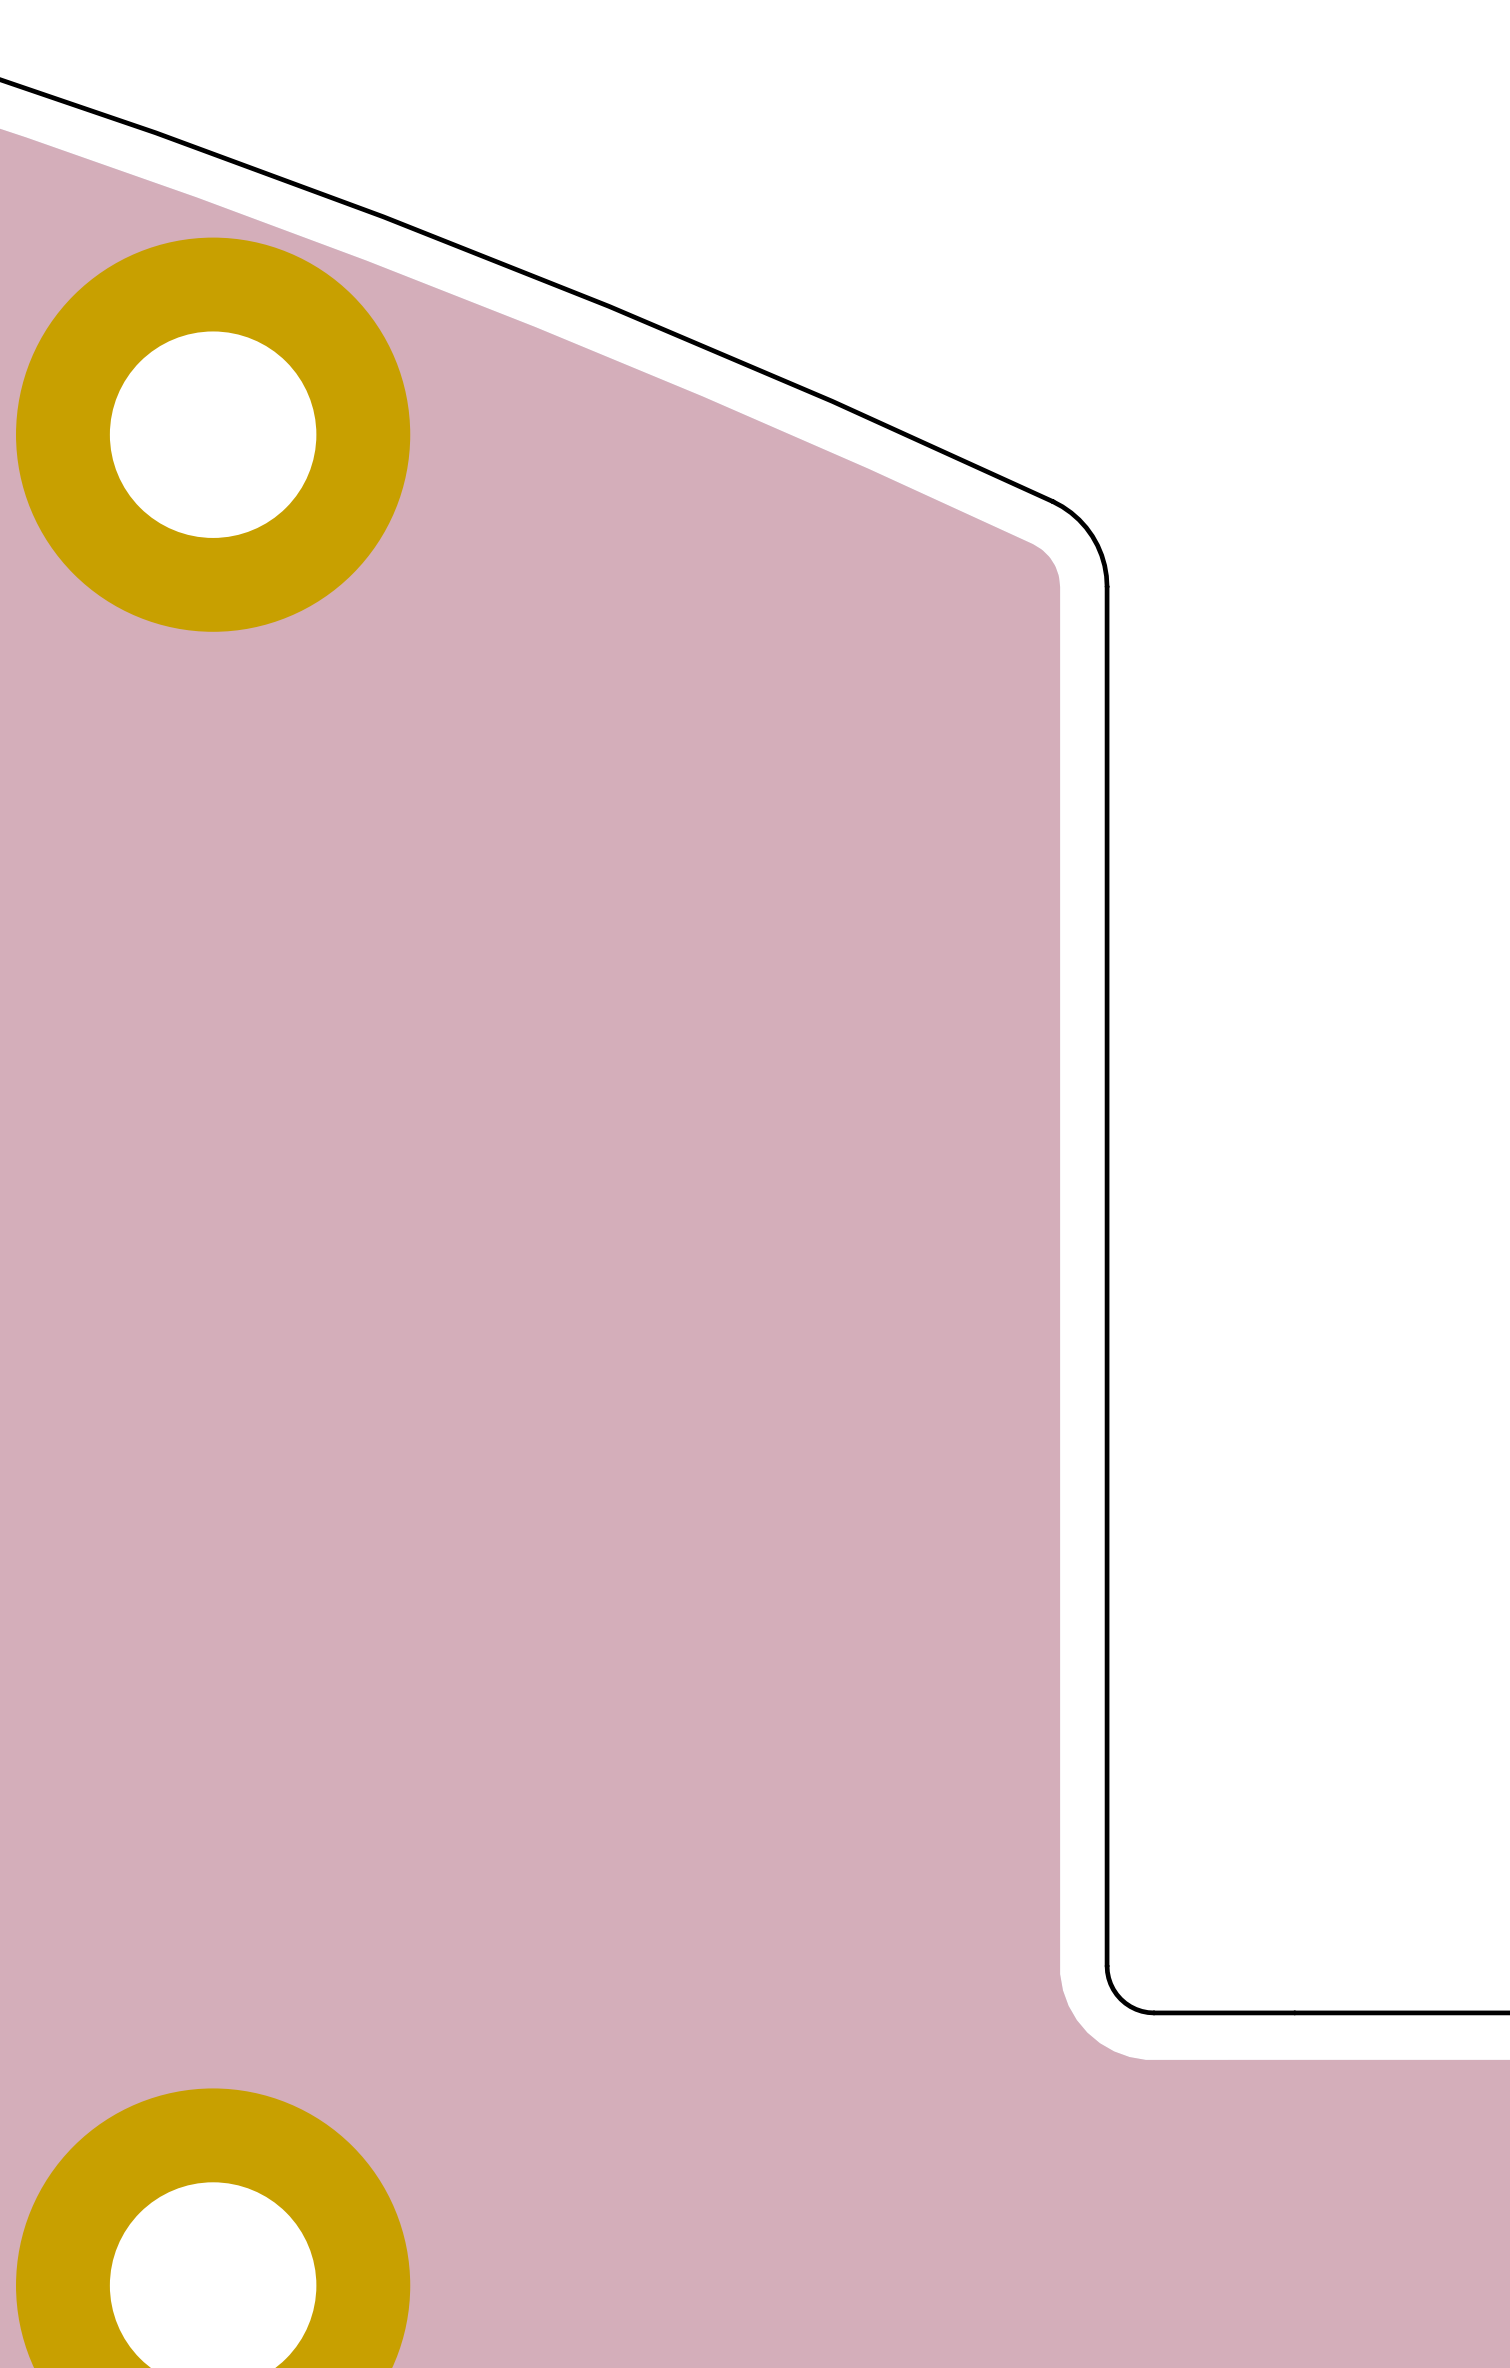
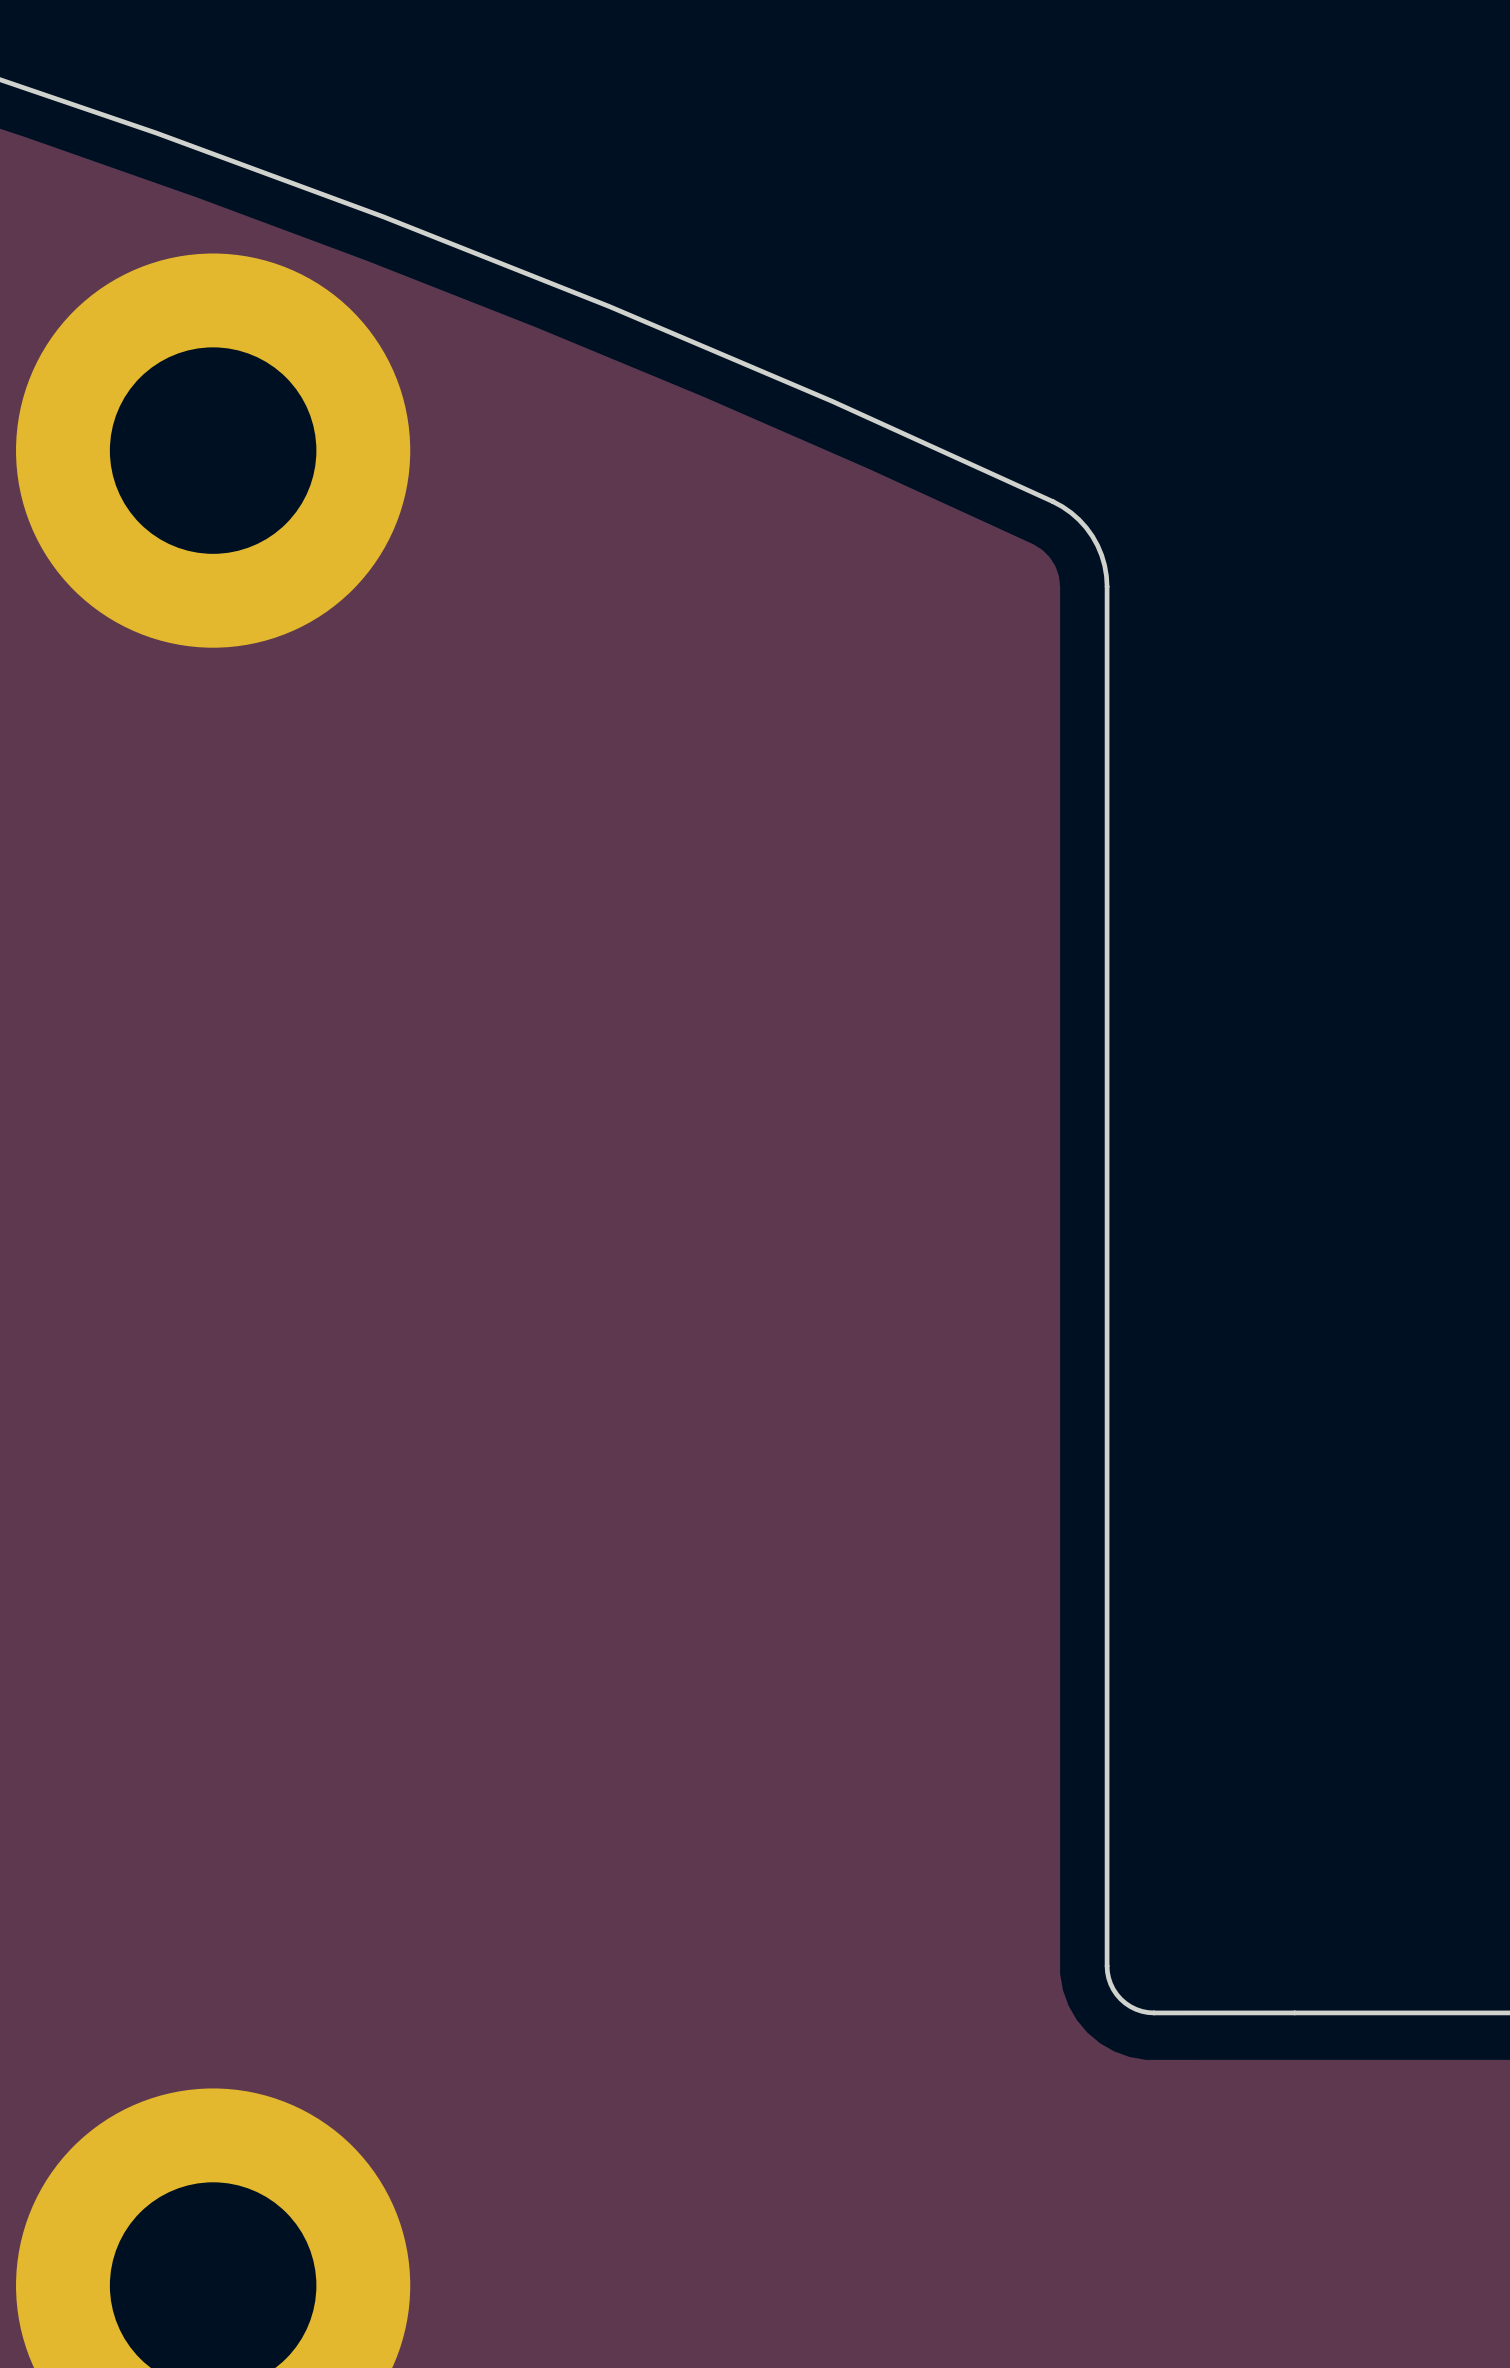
part position: (213, 434) -> (213, 450)

